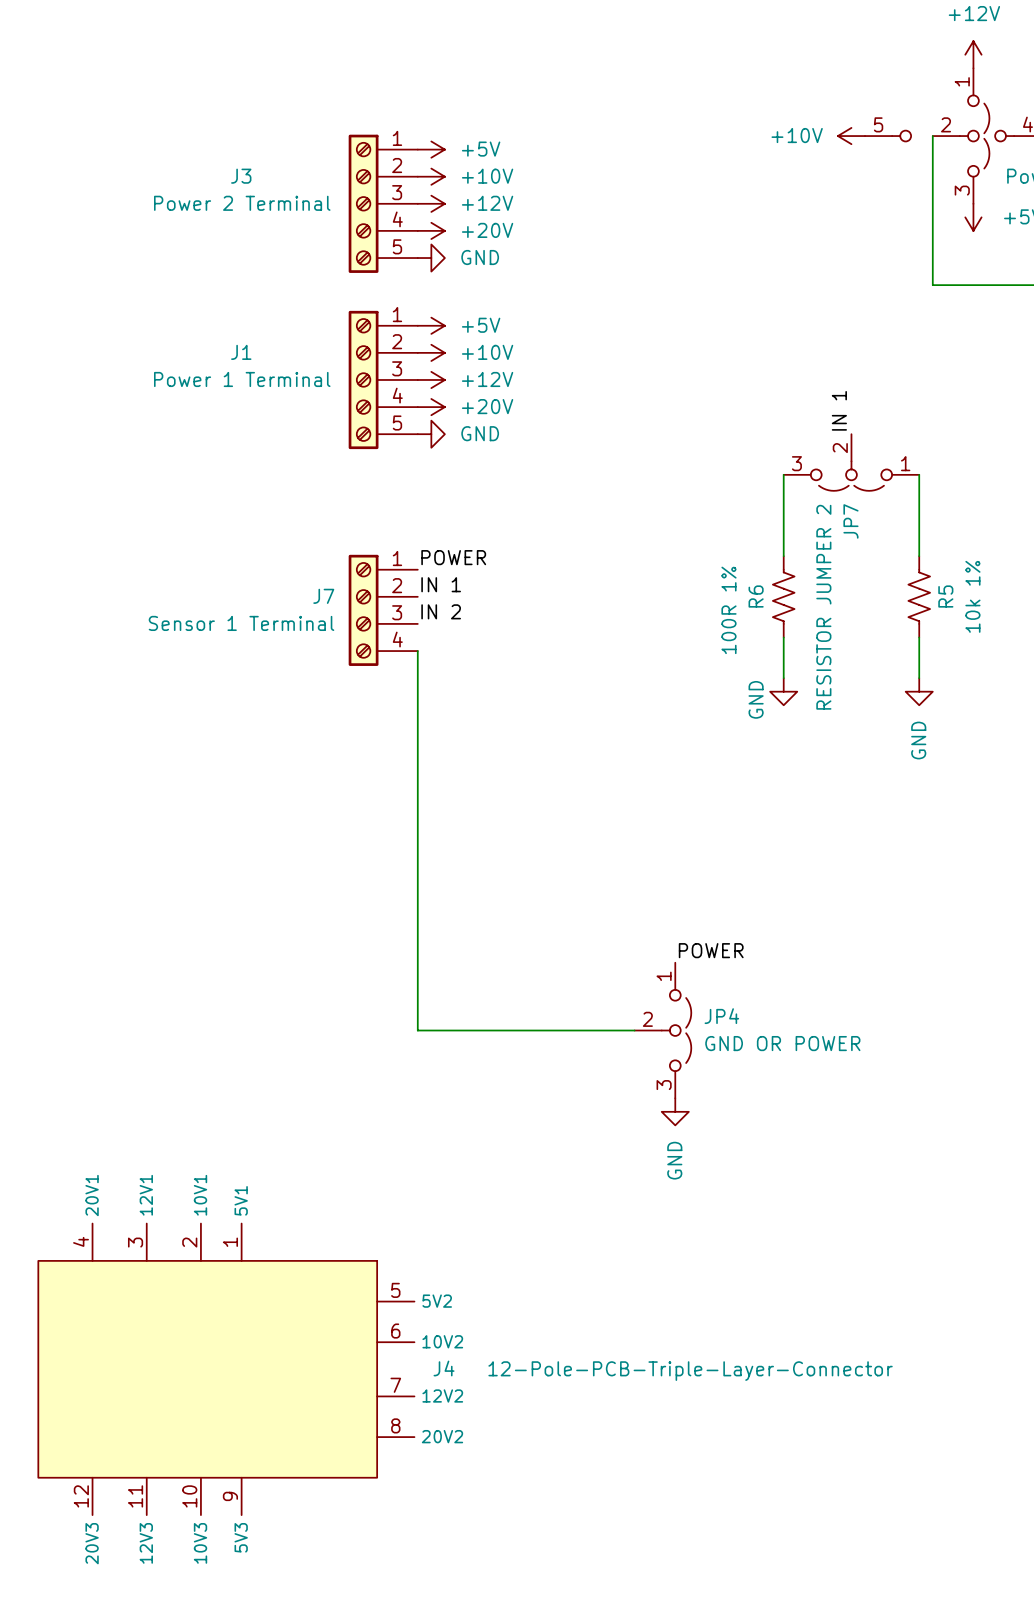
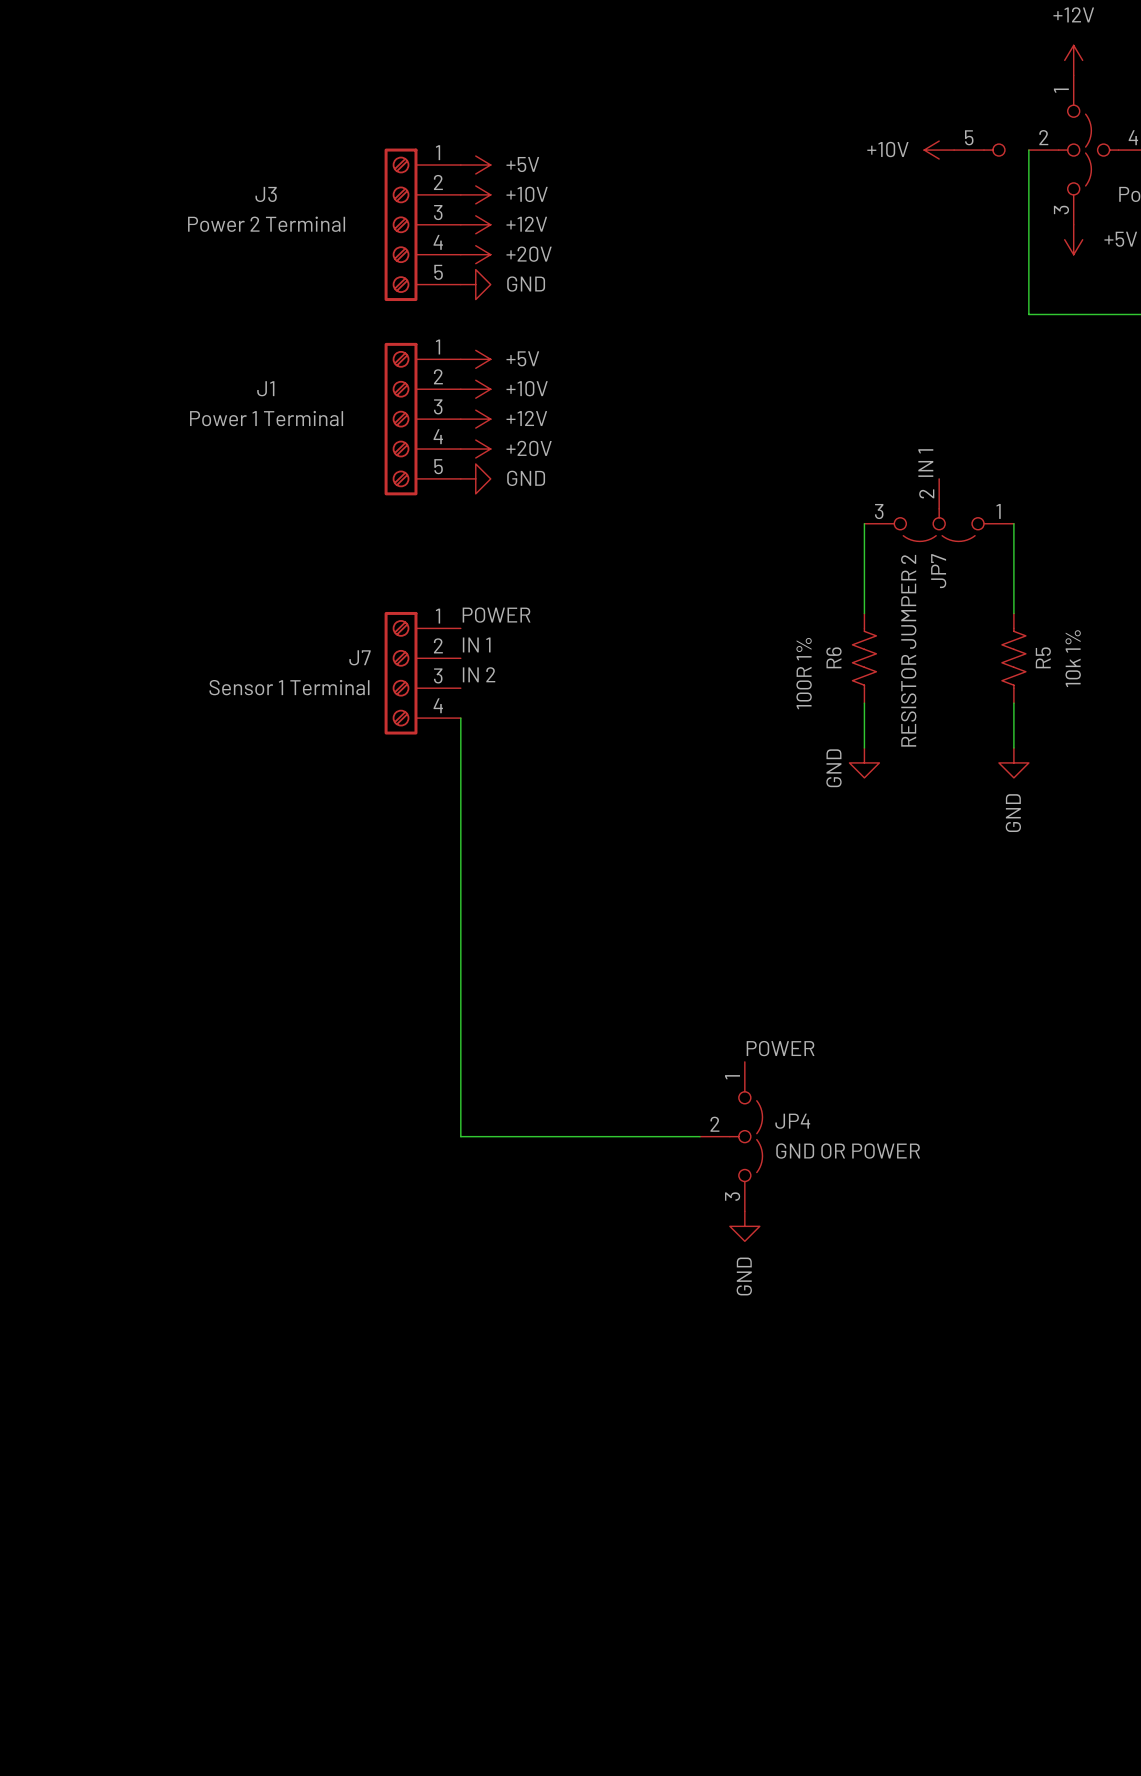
J4: 12-Pole-PCB-Triple-Layer-Connector (226, 1369) -> none

